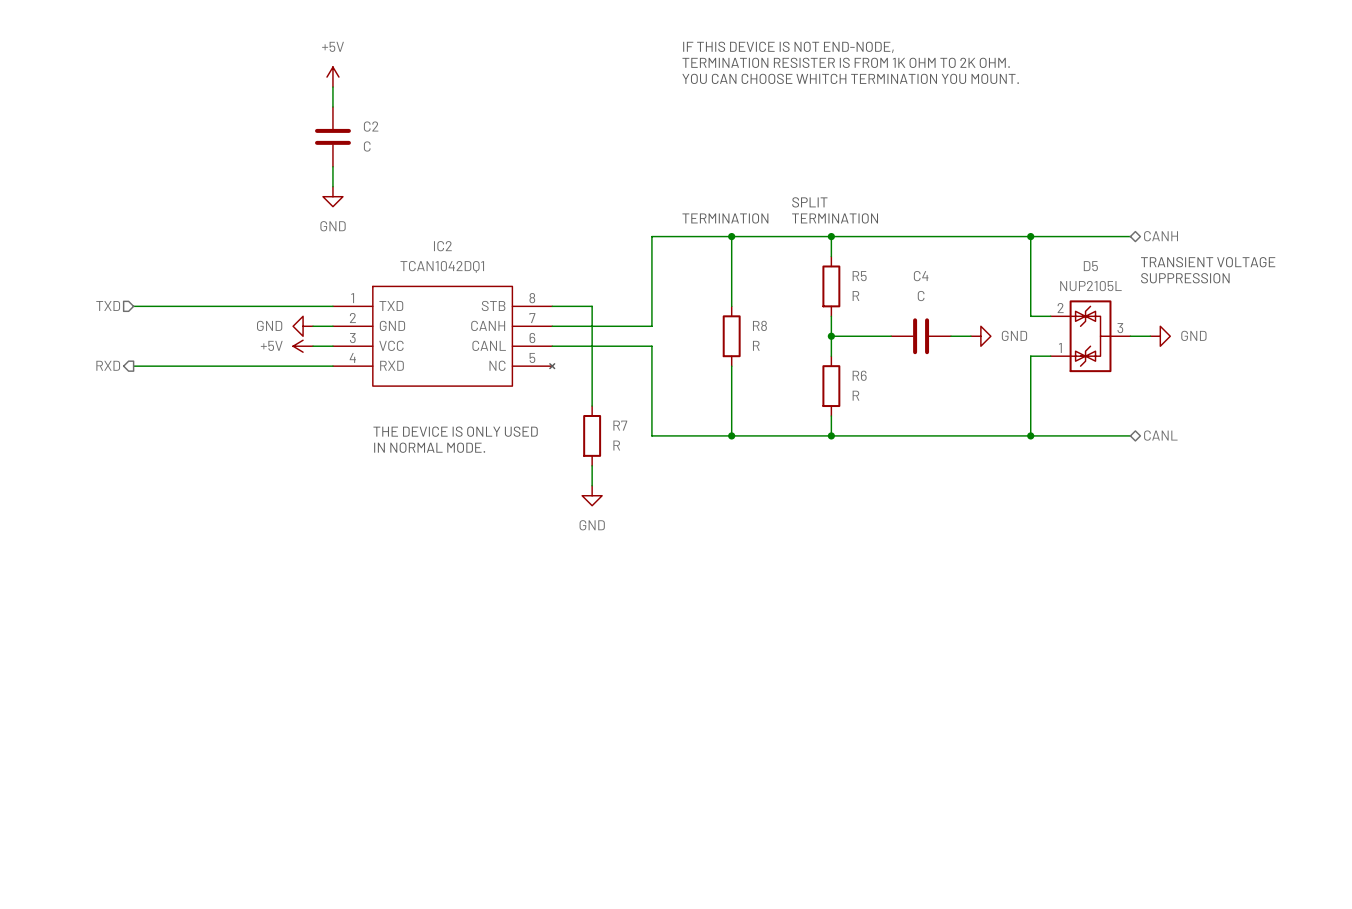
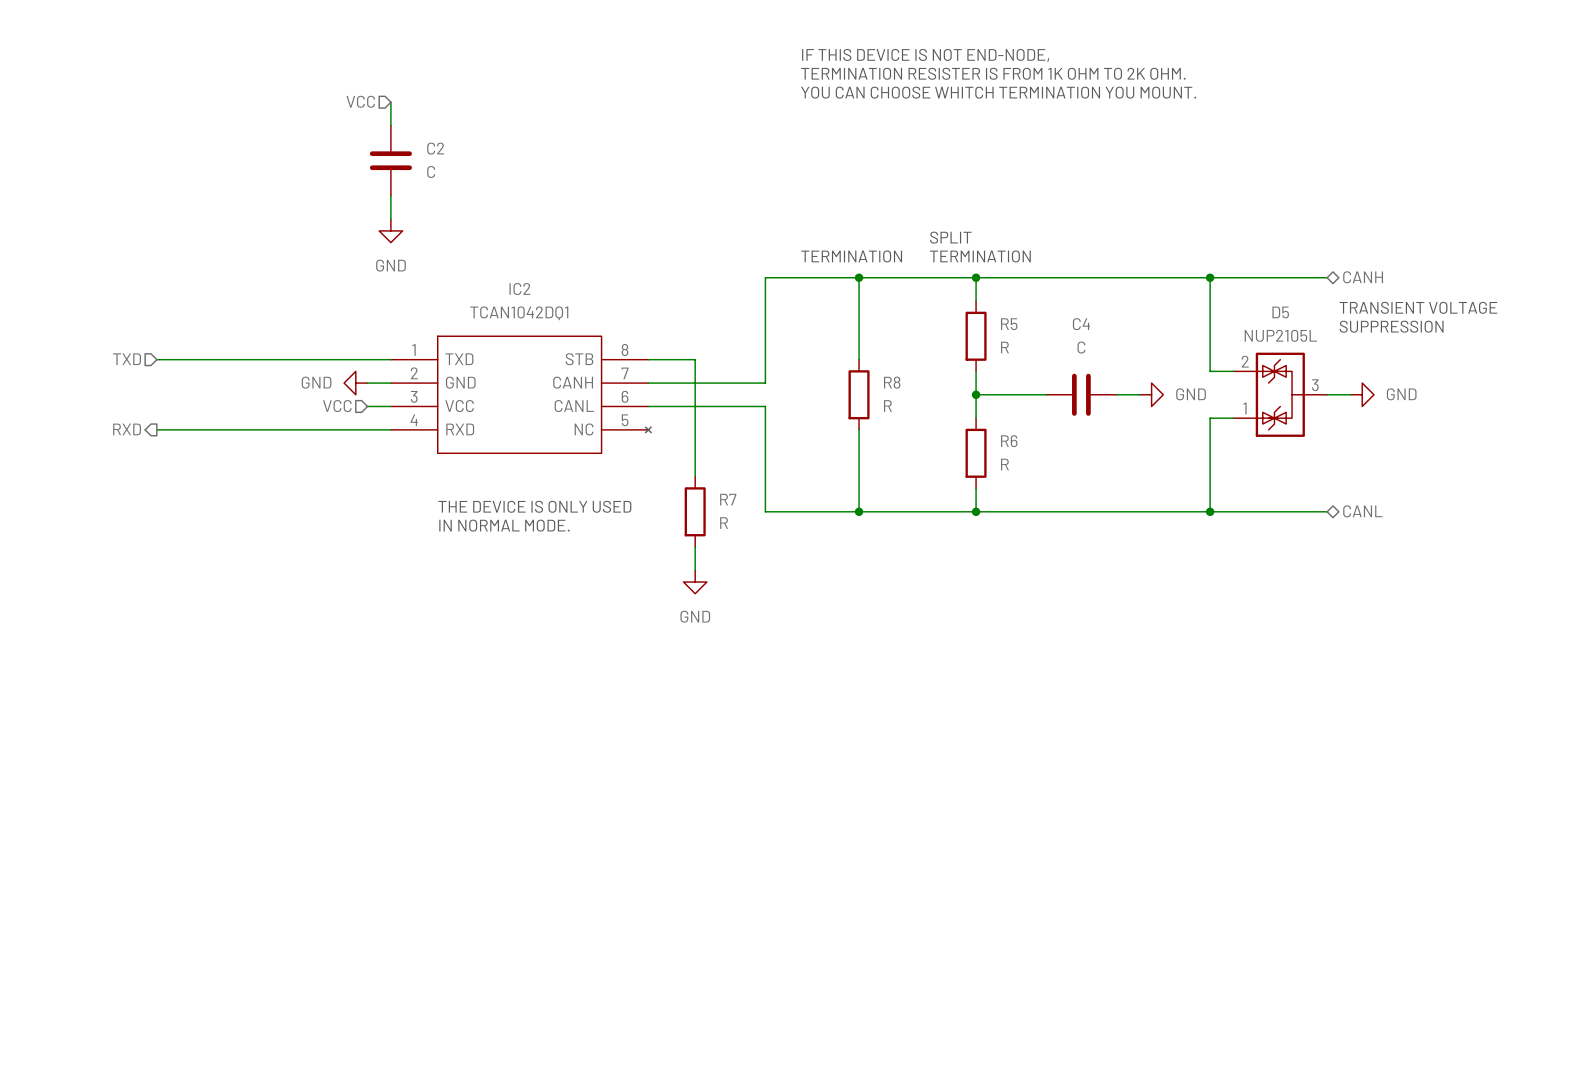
power symbol: +5V (332, 77) -> none
hierarchical label: none -> VCC (360, 101)
hierarchical label: none -> VCC (337, 406)
power symbol: +5V (303, 346) -> none

